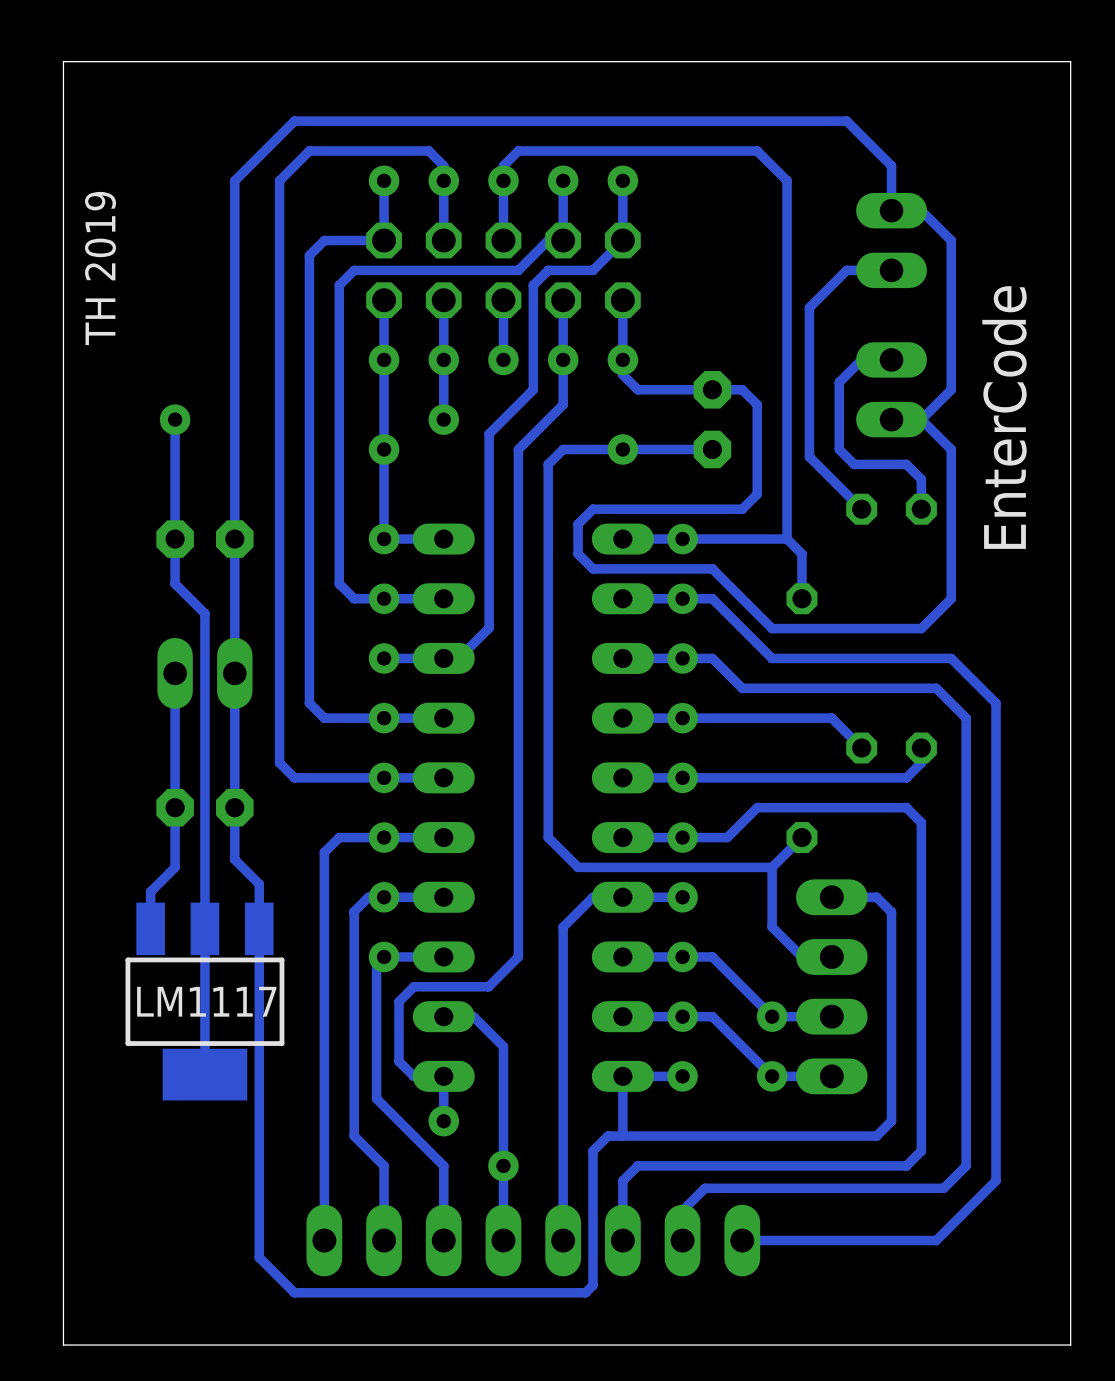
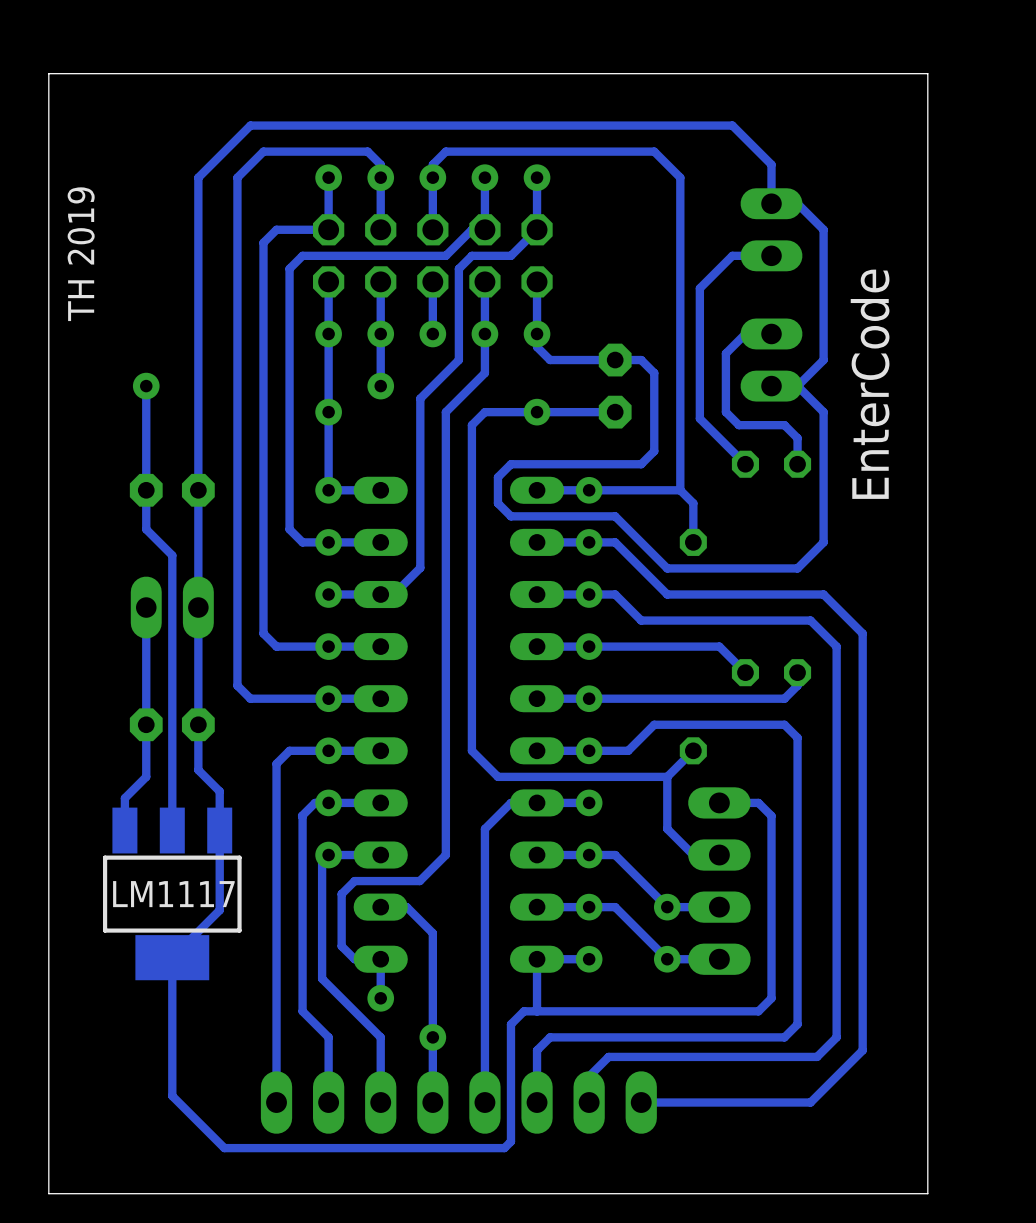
track: (204, 928) (204, 1074) -> none
track: (259, 1020) (259, 1257) (294, 1292) -> (219, 910) (172, 957) (172, 1096) (224, 1148) (250, 1148)

